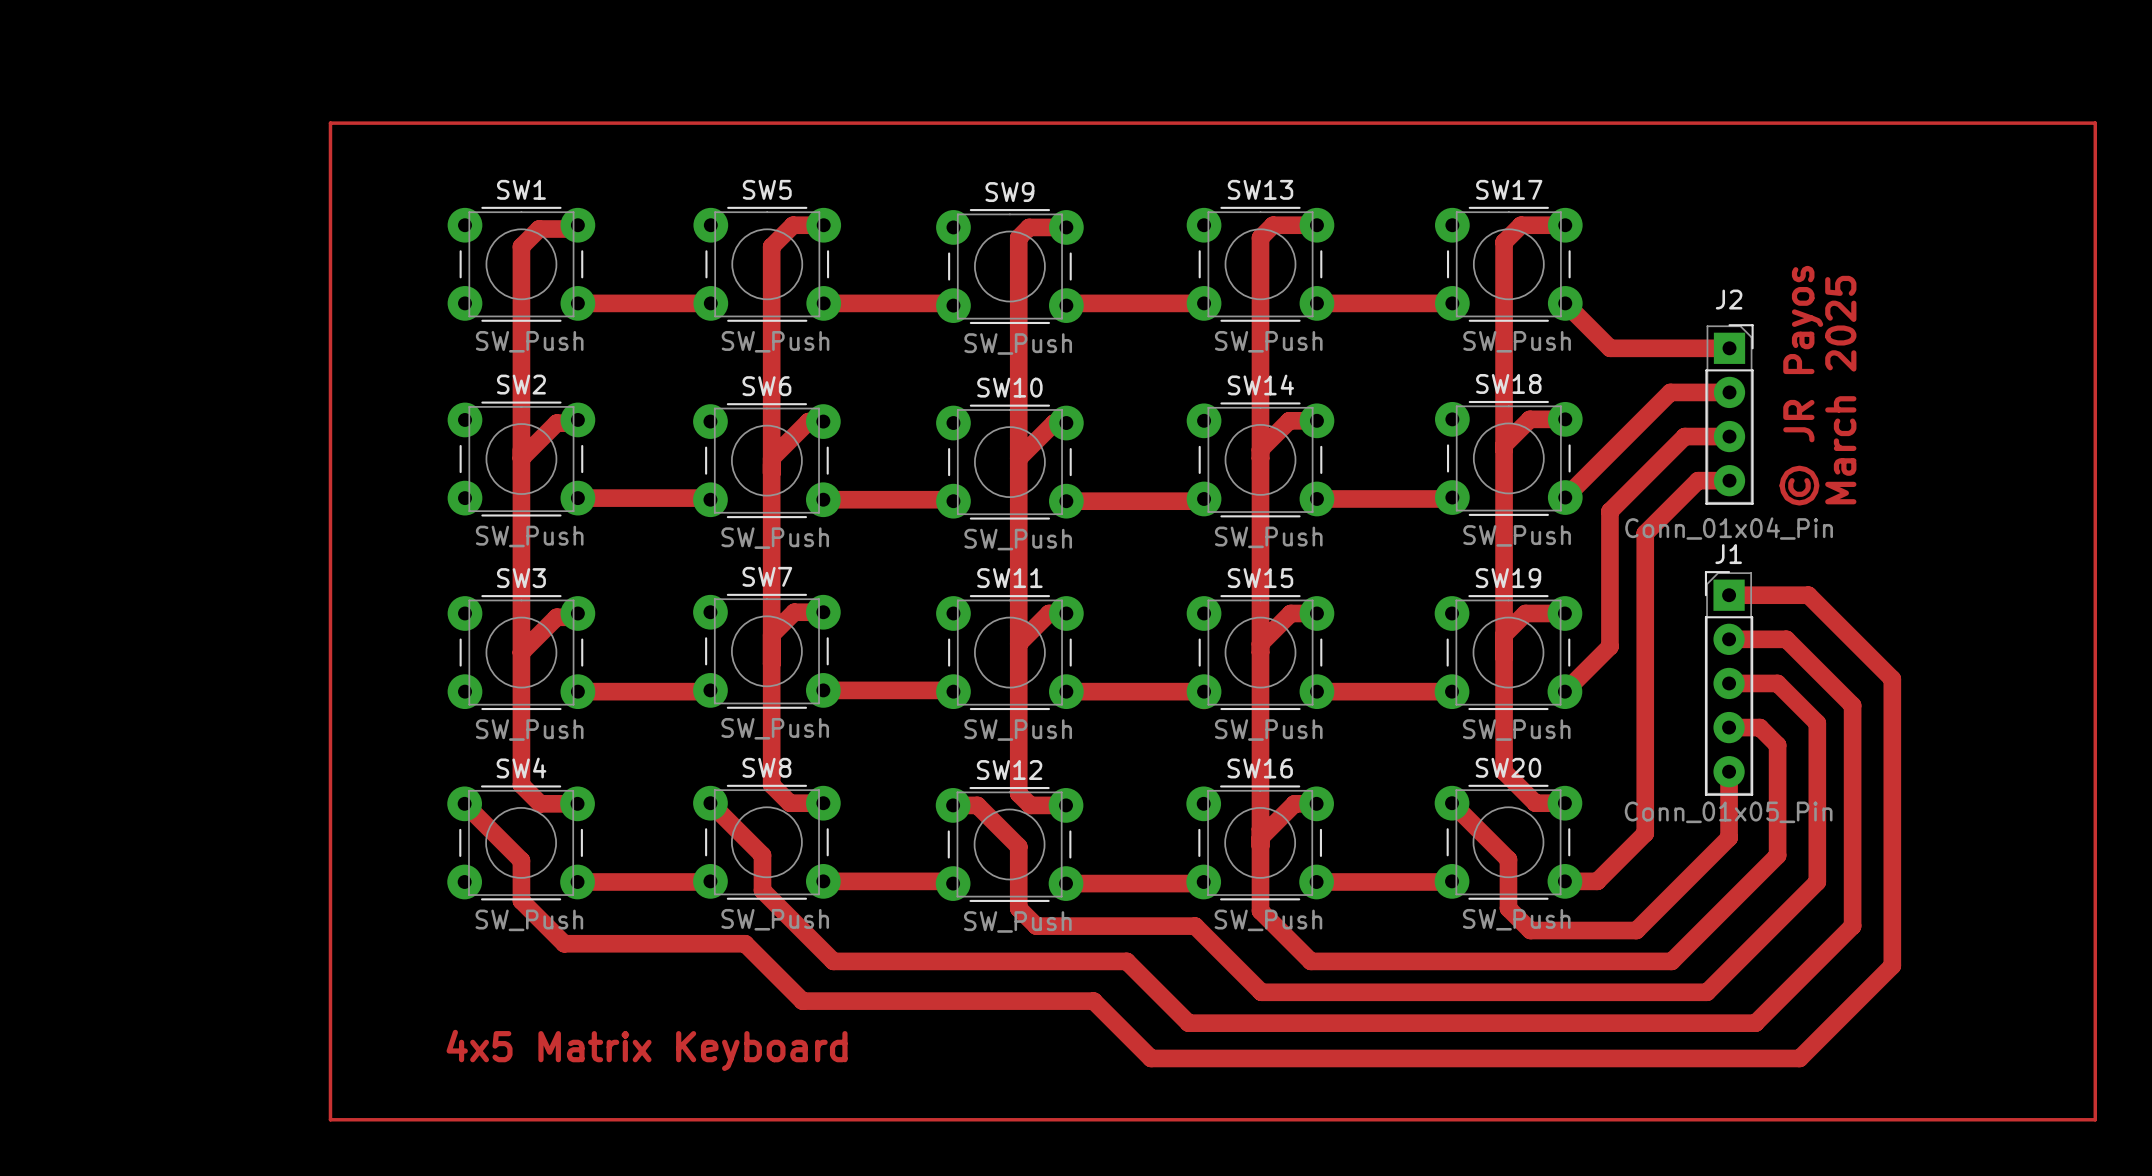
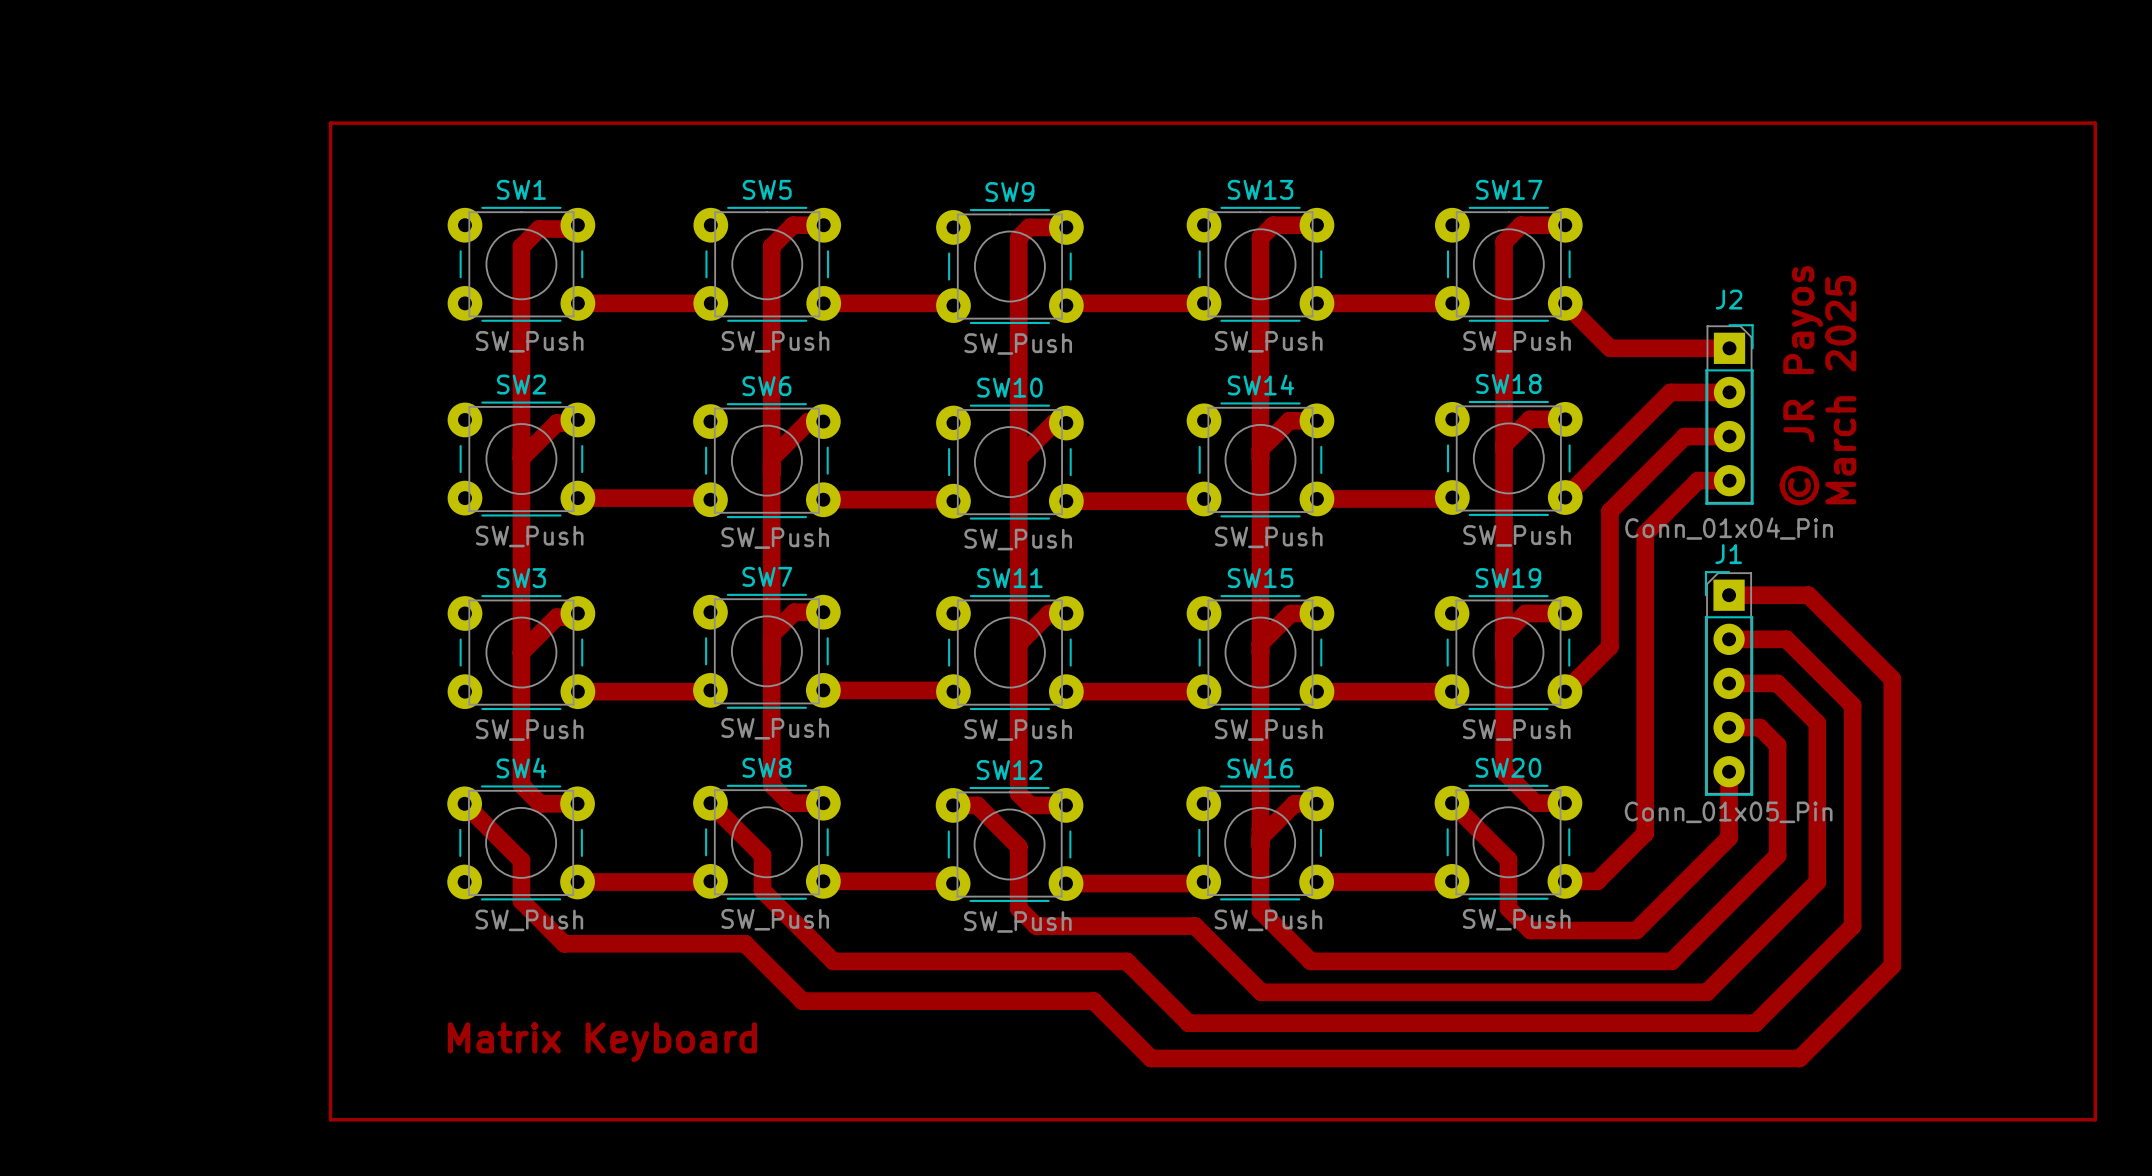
text: 4x5 Matrix Keyboard (647, 1050) -> Matrix Keyboard (602, 1042)

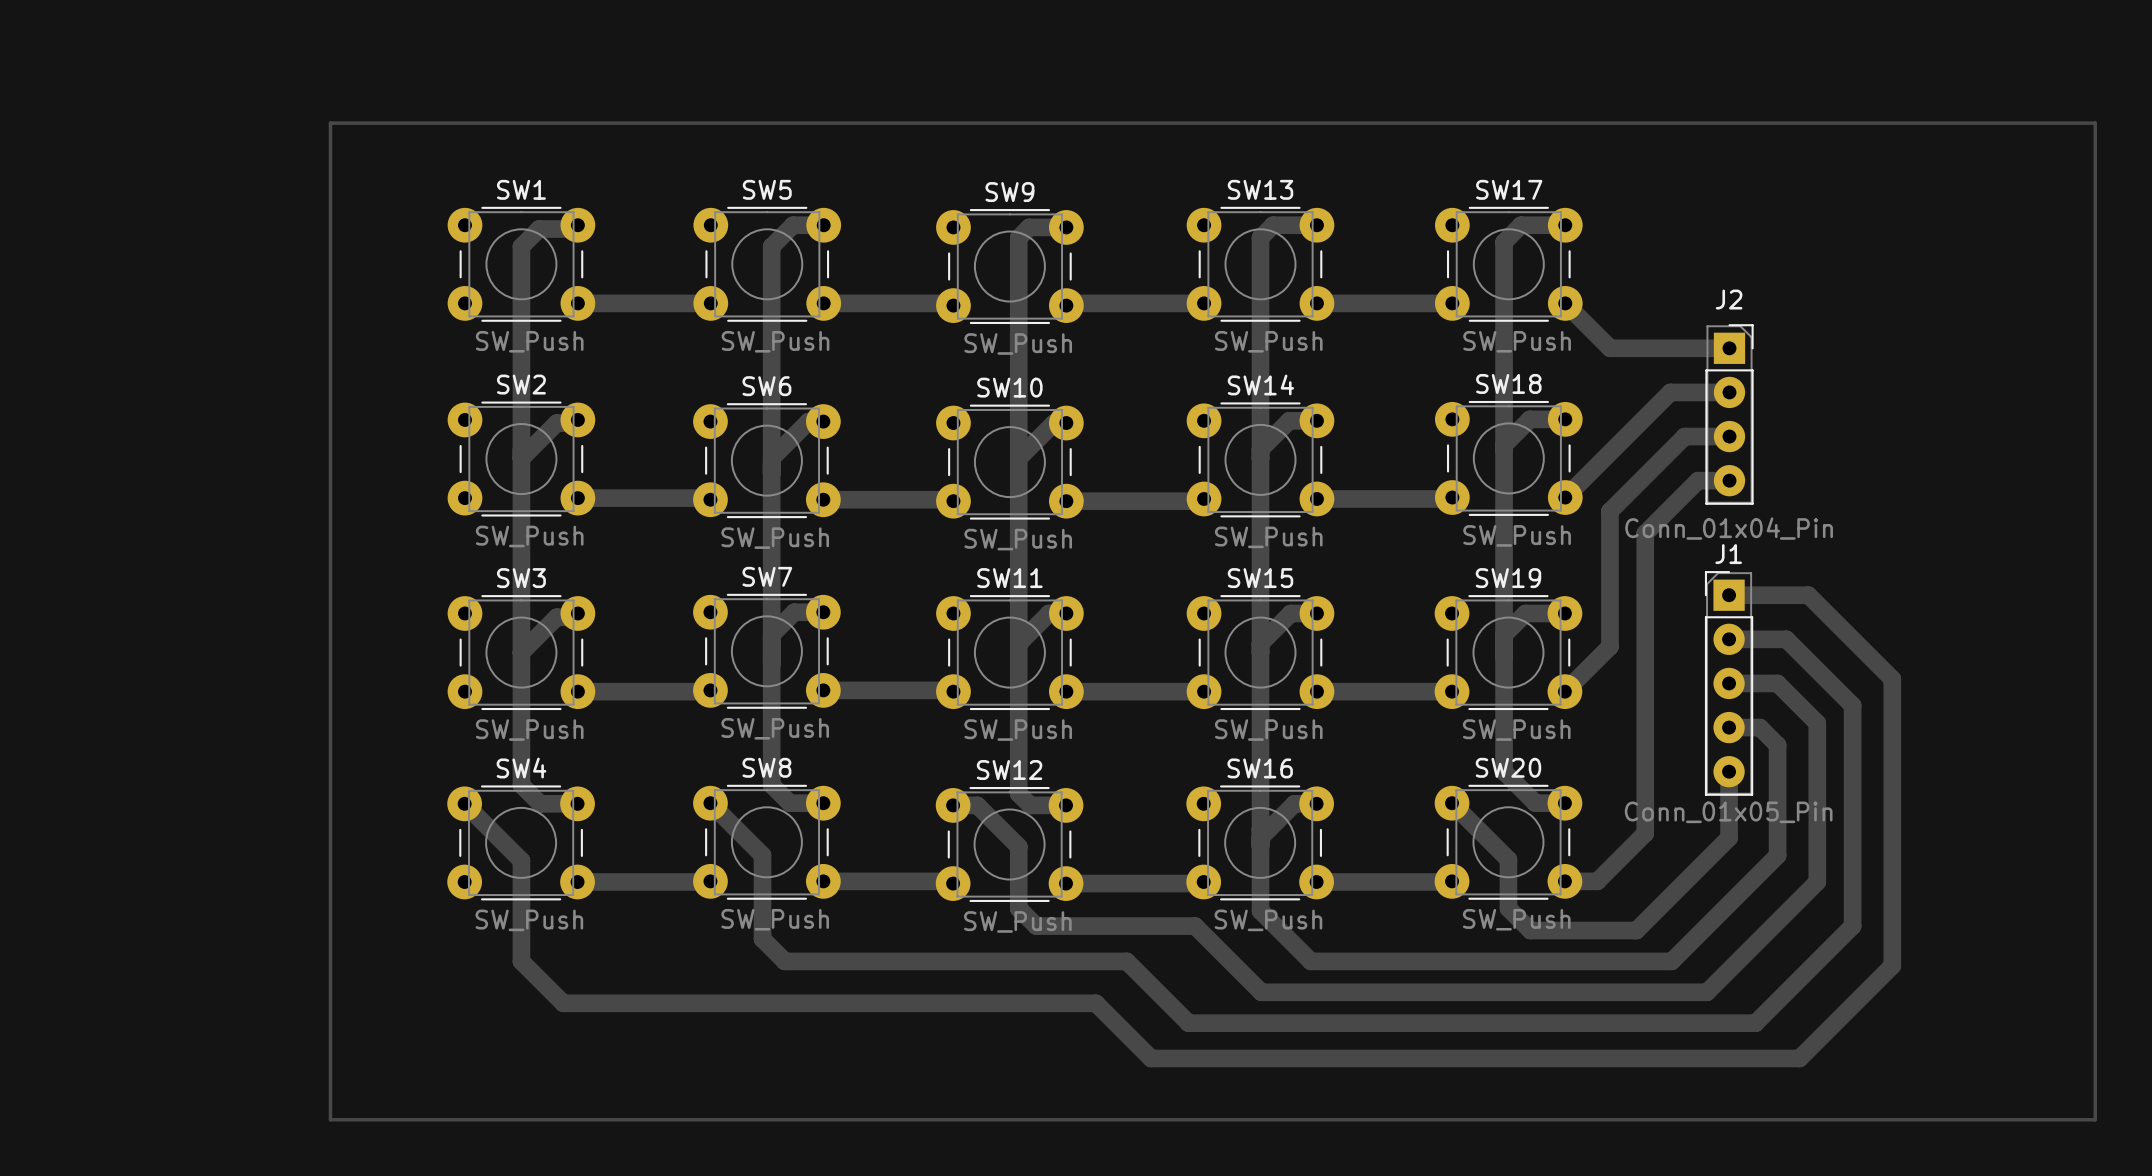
text: © JR Payos (1801, 385) -> none
text: March 2025 (1840, 390) -> none
track: (762, 890) (833, 961) -> (762, 890) (762, 939) (784, 961) (833, 961)
track: (521, 900) (564, 943) (745, 943) (802, 1001) (1093, 1001) (1095, 1003) -> (521, 900) (521, 961) (563, 1003) (1095, 1003)
text: Matrix Keyboard (602, 1042) -> none

